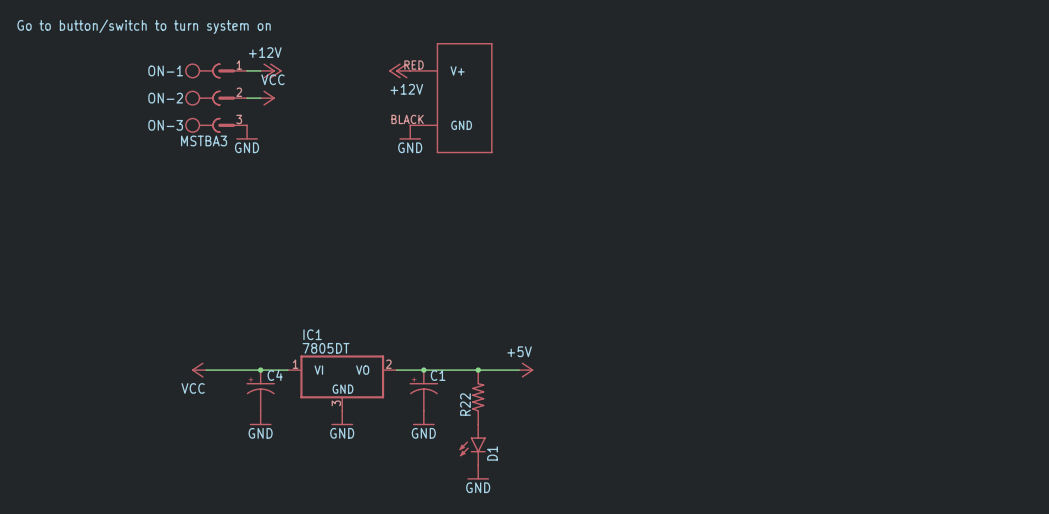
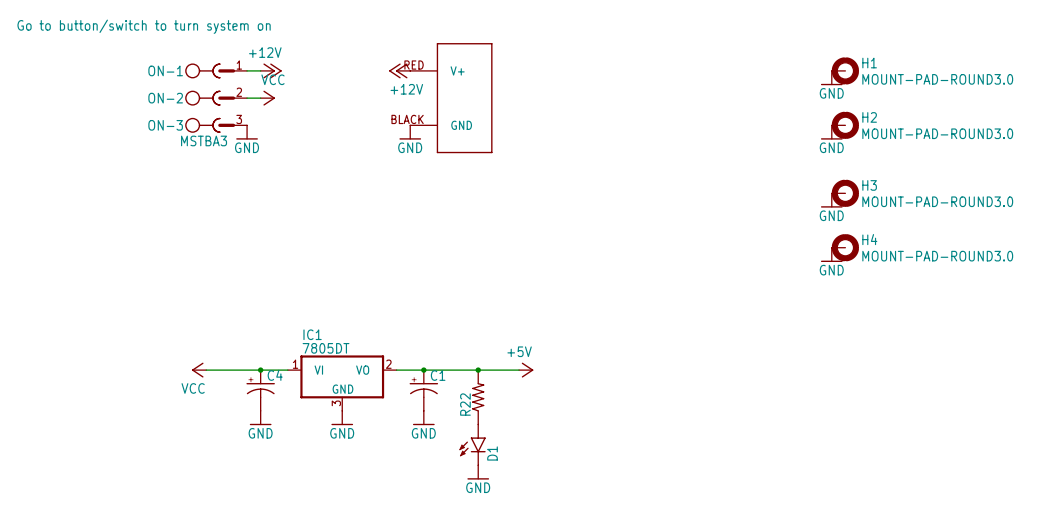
H1: none -> MOUNT-PAD-ROUND3.0 (845, 70)
power symbol: none -> GND (831, 78)
H2: none -> MOUNT-PAD-ROUND3.0 (845, 125)
power symbol: none -> GND (831, 132)
H3: none -> MOUNT-PAD-ROUND3.0 (845, 193)
power symbol: none -> GND (831, 200)
H4: none -> MOUNT-PAD-ROUND3.0 (845, 247)
power symbol: none -> GND (831, 254)

